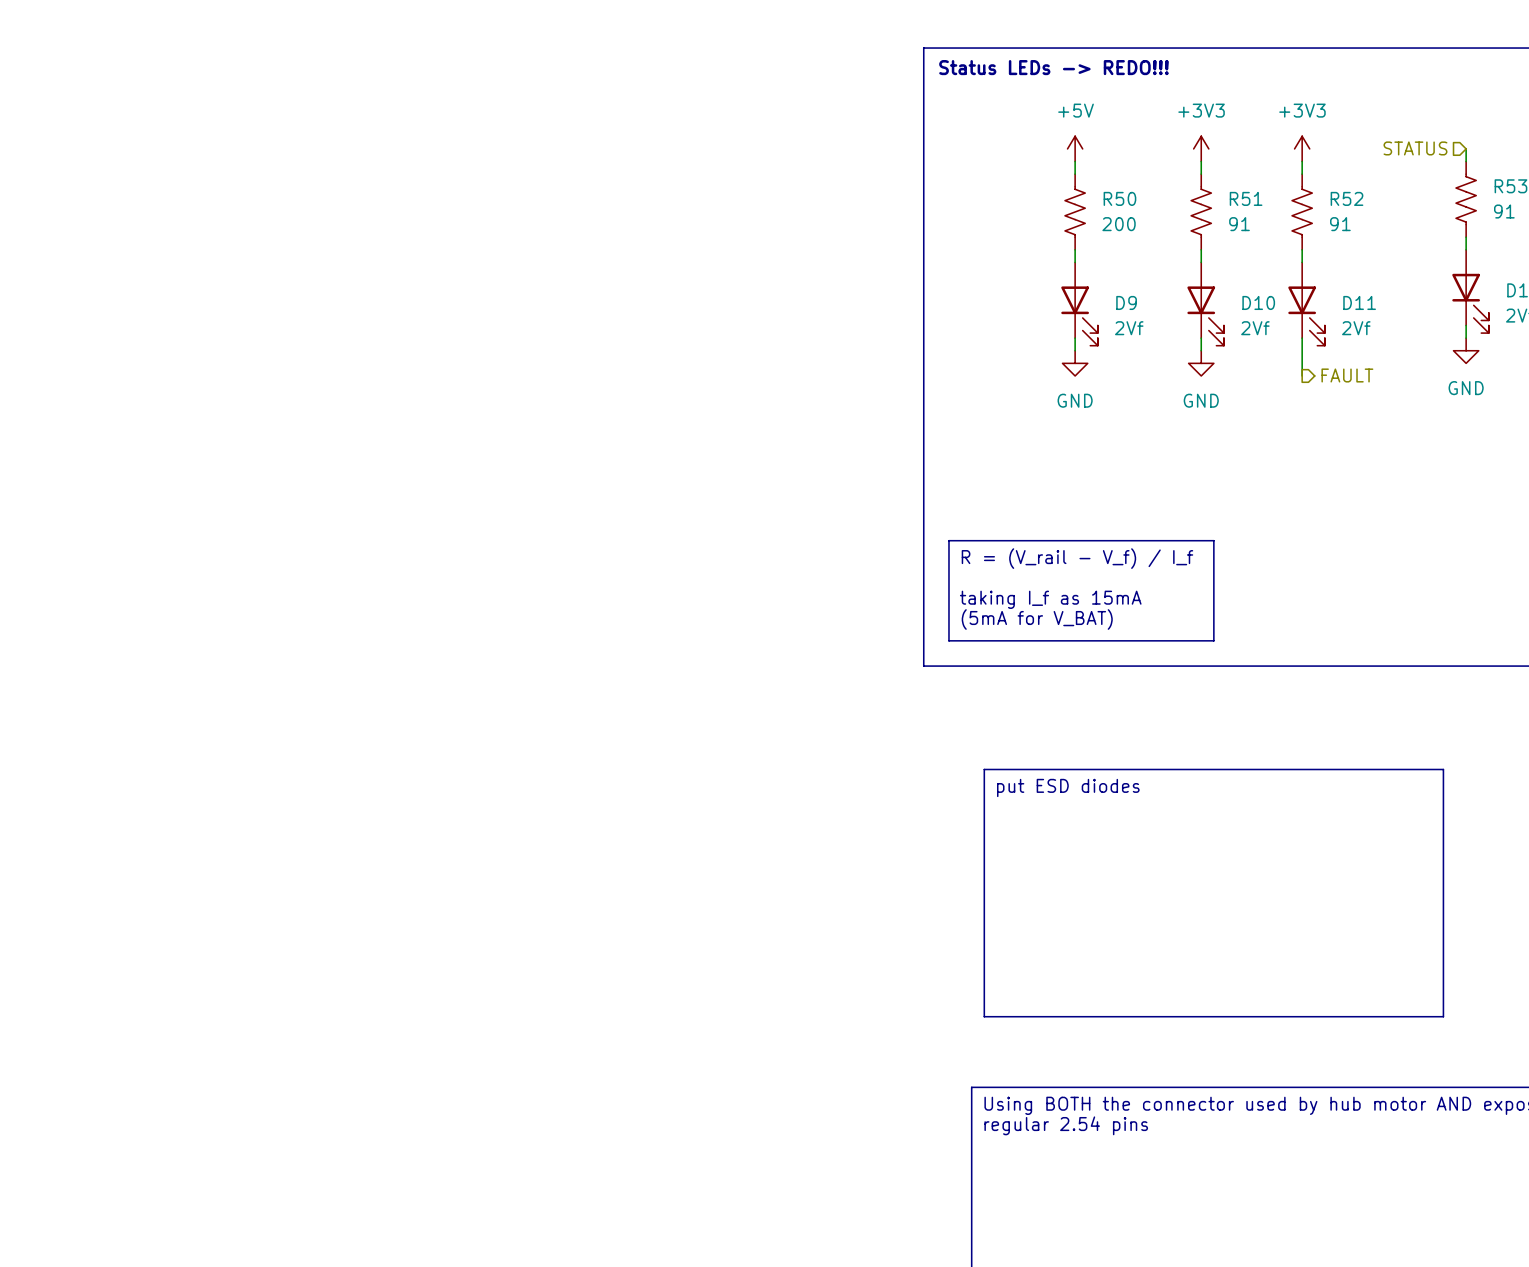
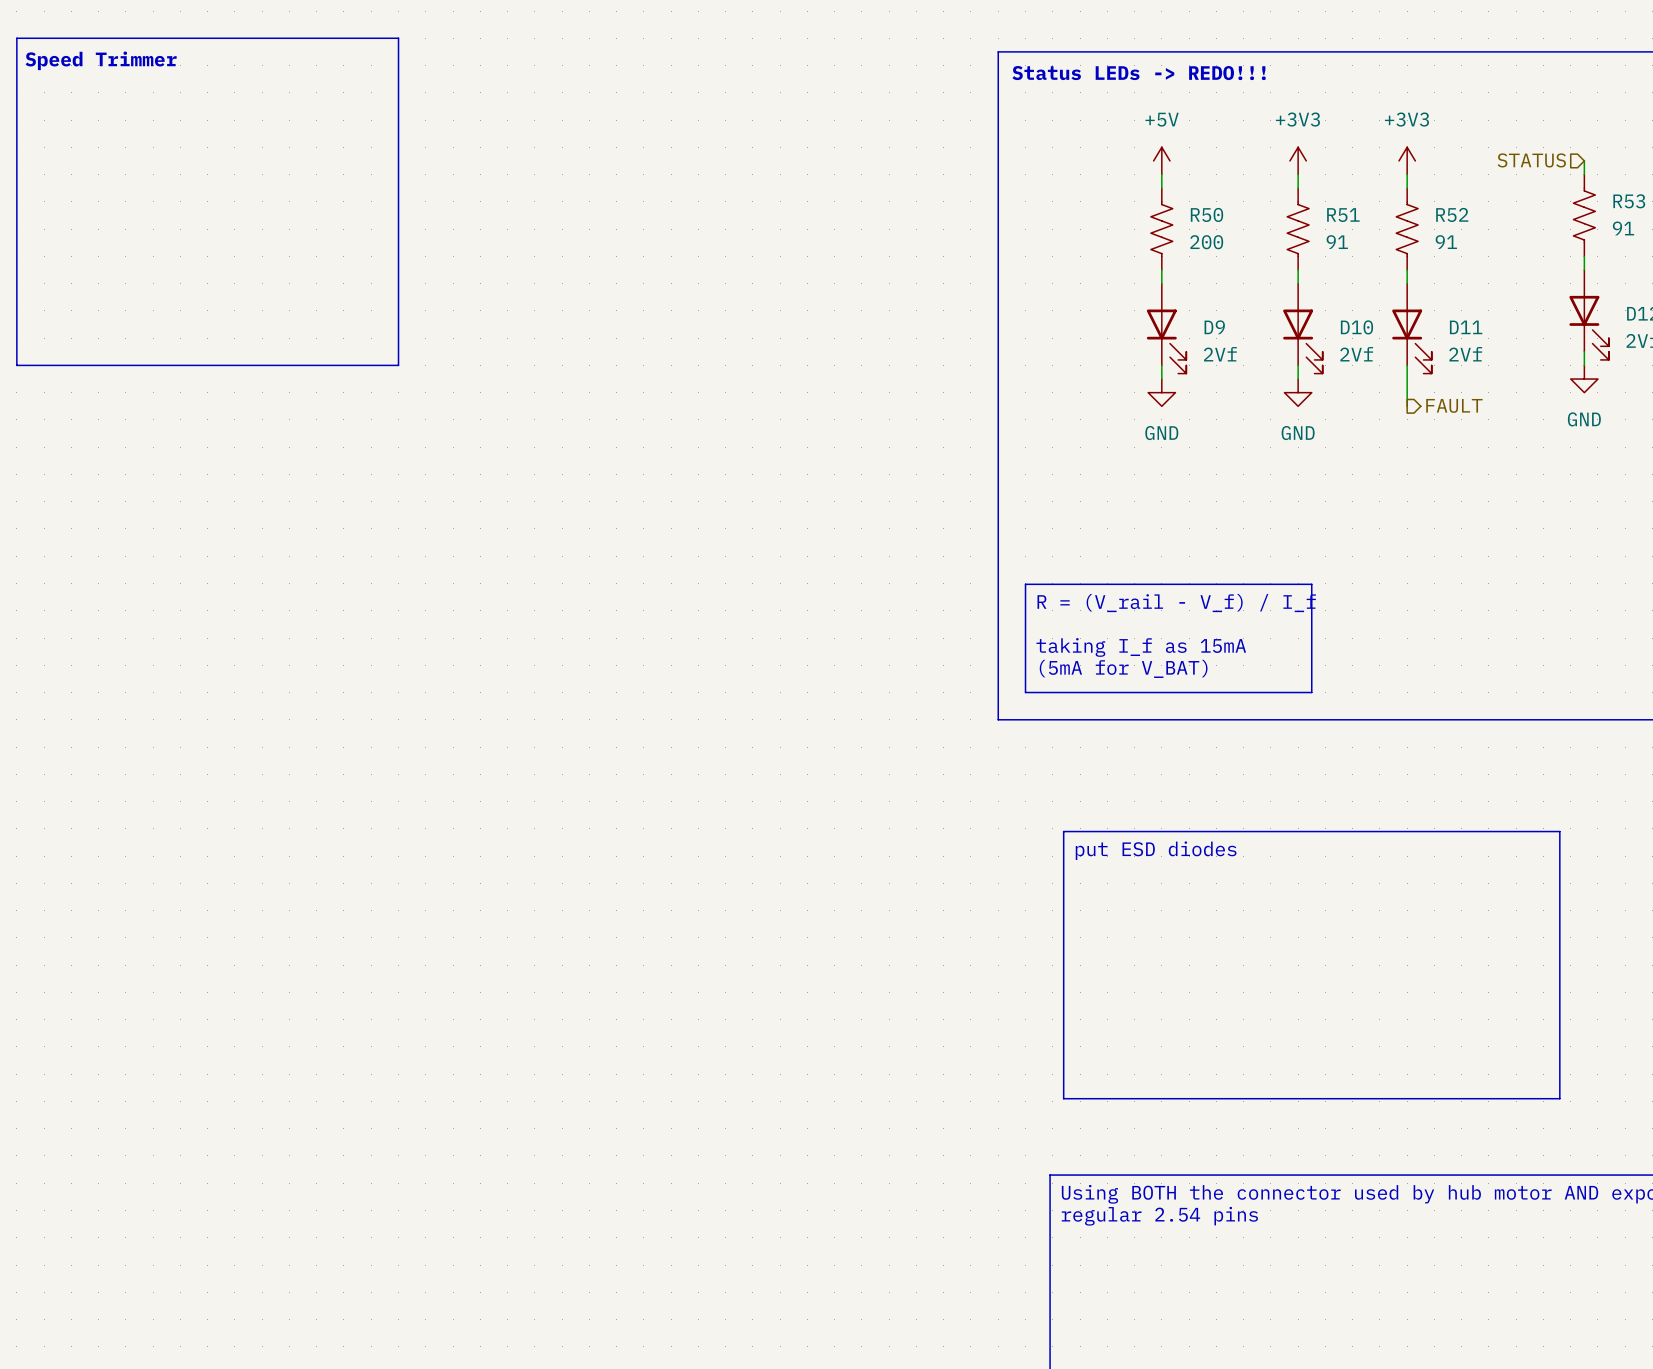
line: none -> (16, 38) (398, 38) (398, 365) (16, 365) (16, 38)
text: none -> Speed Trimmer (101, 60)

